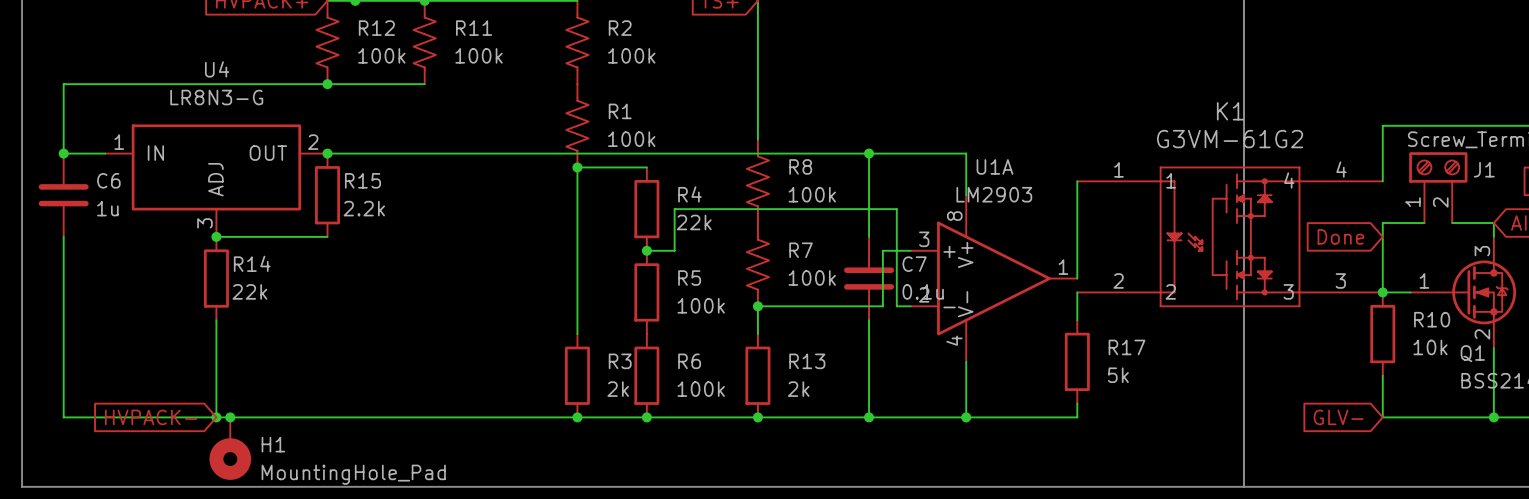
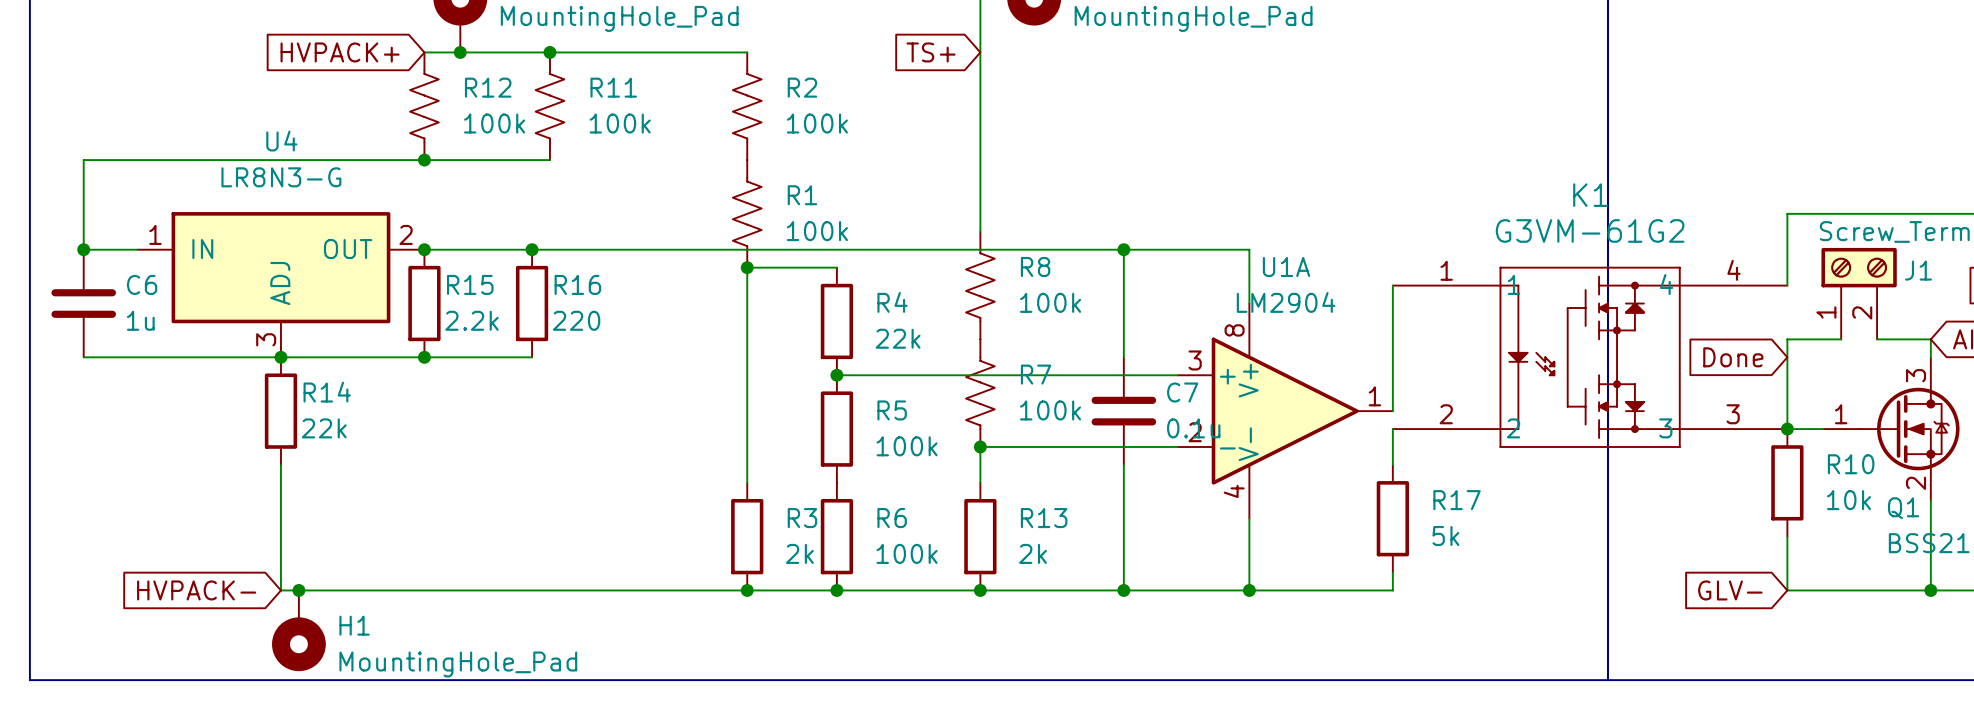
junction: none -> (532, 249)
U1A value: LM2903 (994, 194) -> LM2904 (1286, 302)
R16: none -> 220 (532, 303)
wire: (63, 236) (63, 417) (216, 417) -> (83, 357) (280, 357)
wire: none -> (424, 357) (532, 357)
junction: none -> (424, 357)
wire: (674, 250) (674, 209) (896, 209) (896, 306) -> (872, 375) (1141, 375)
wire: (882, 250) (882, 306) -> (1159, 446) (1141, 446)
junction: (216, 417) -> none

